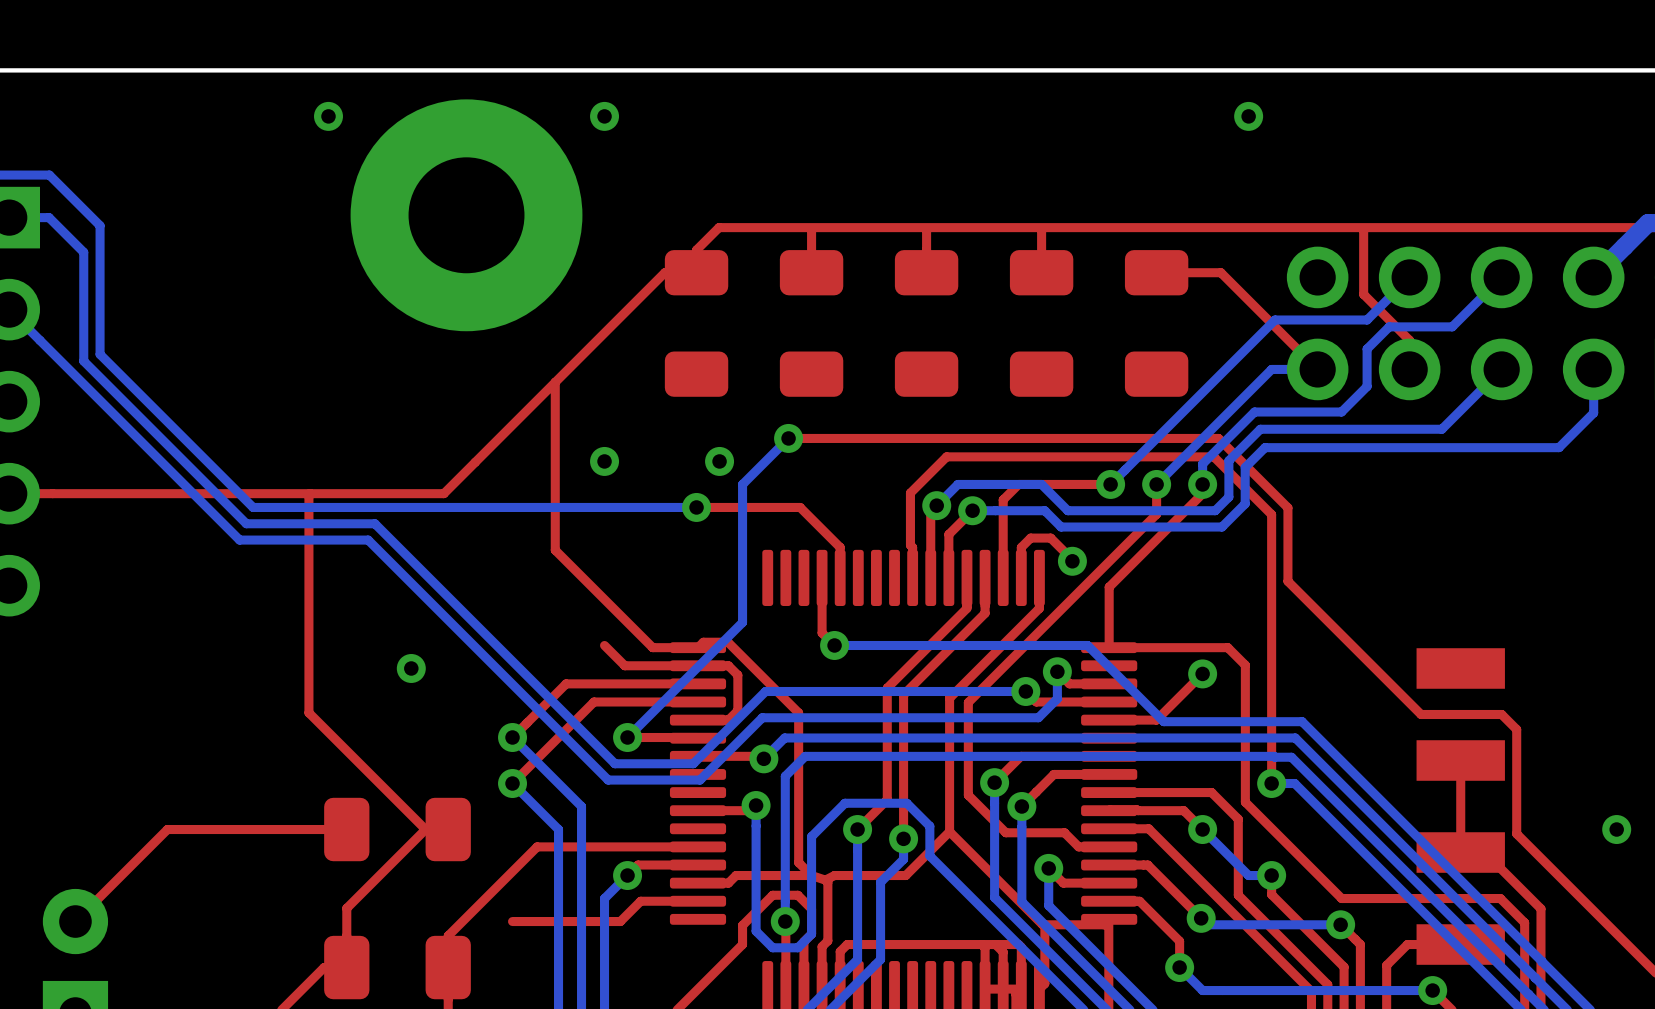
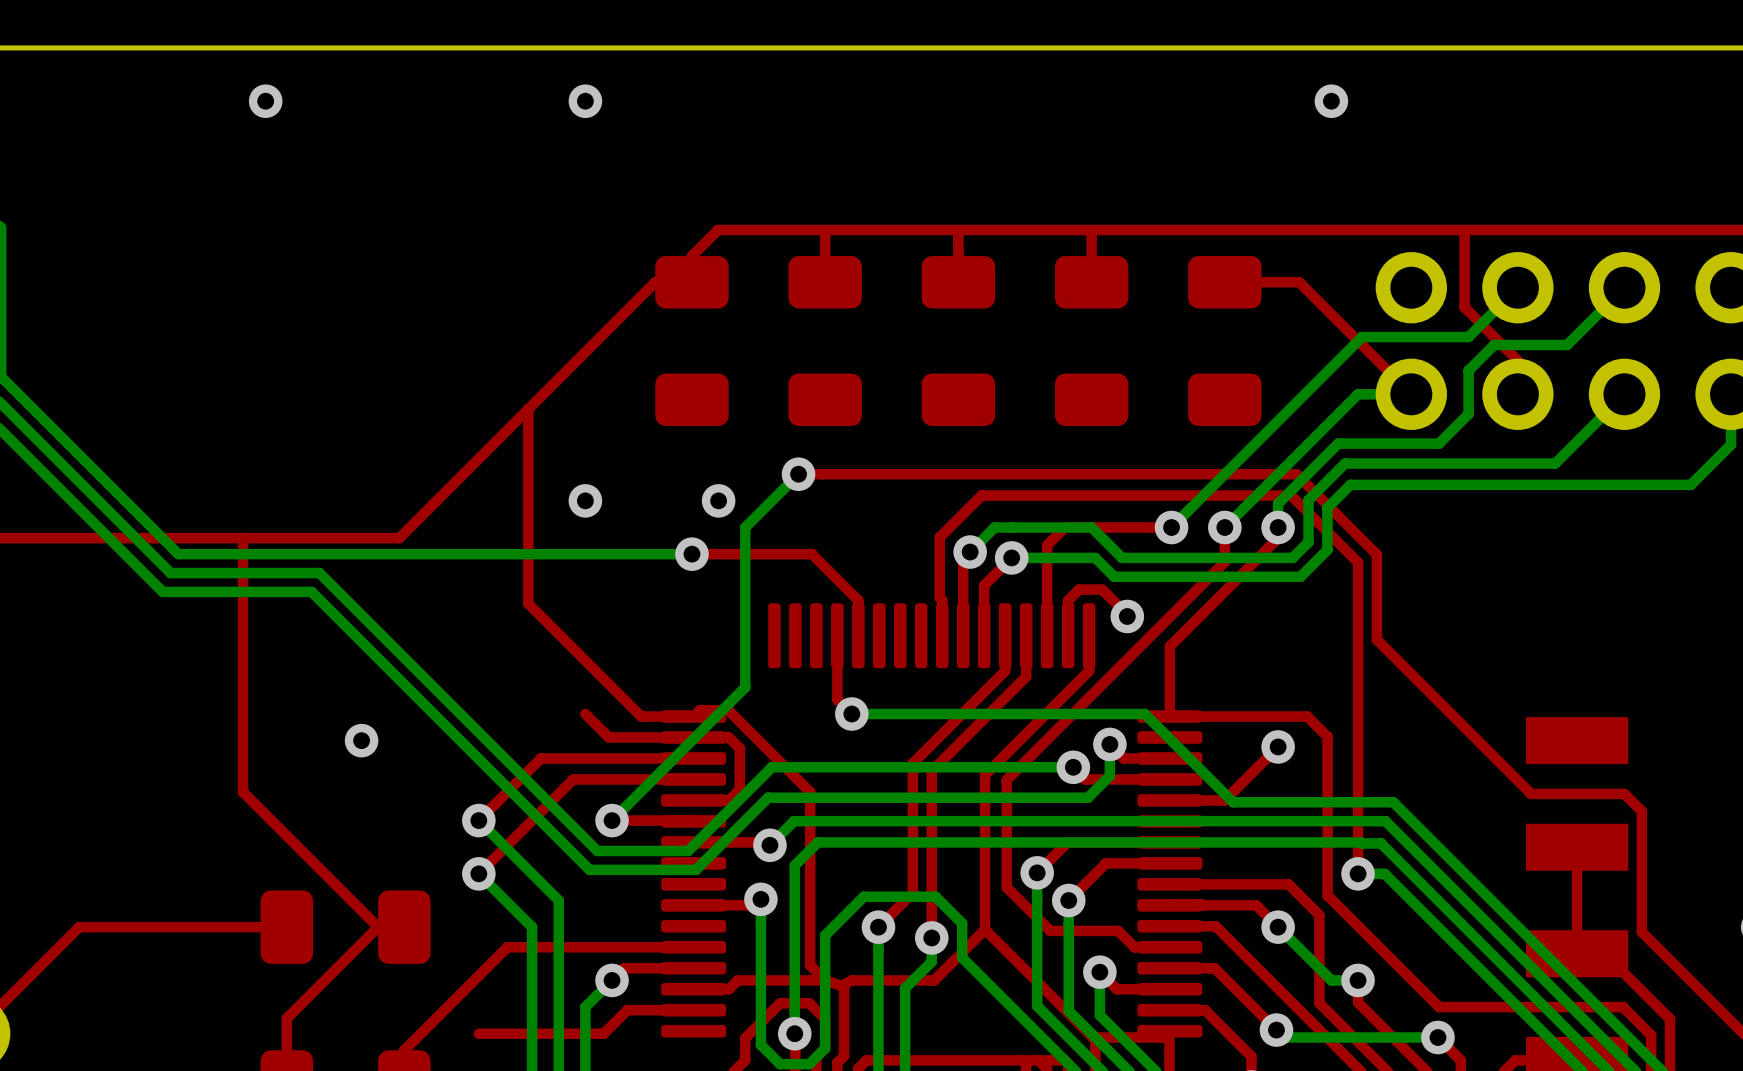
part: (466, 215) -> none

